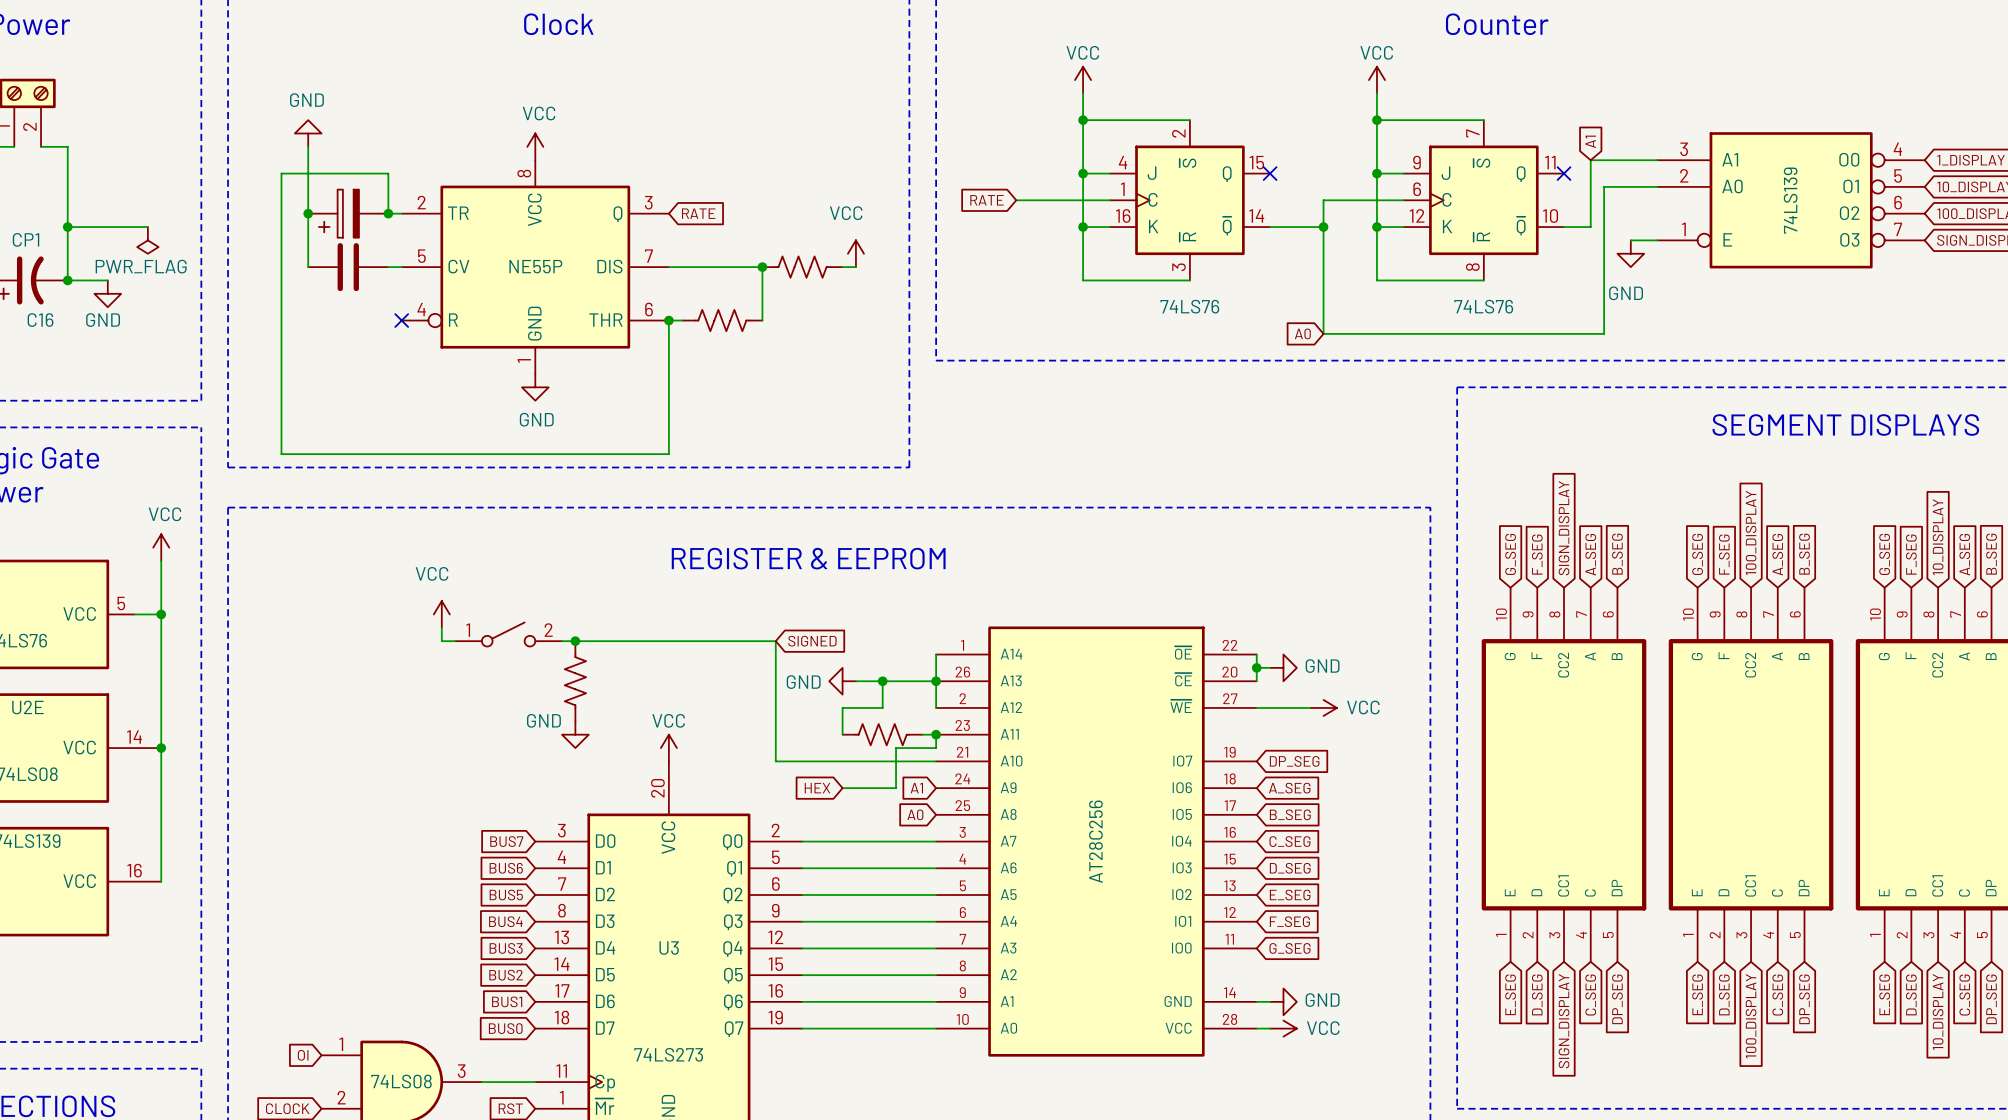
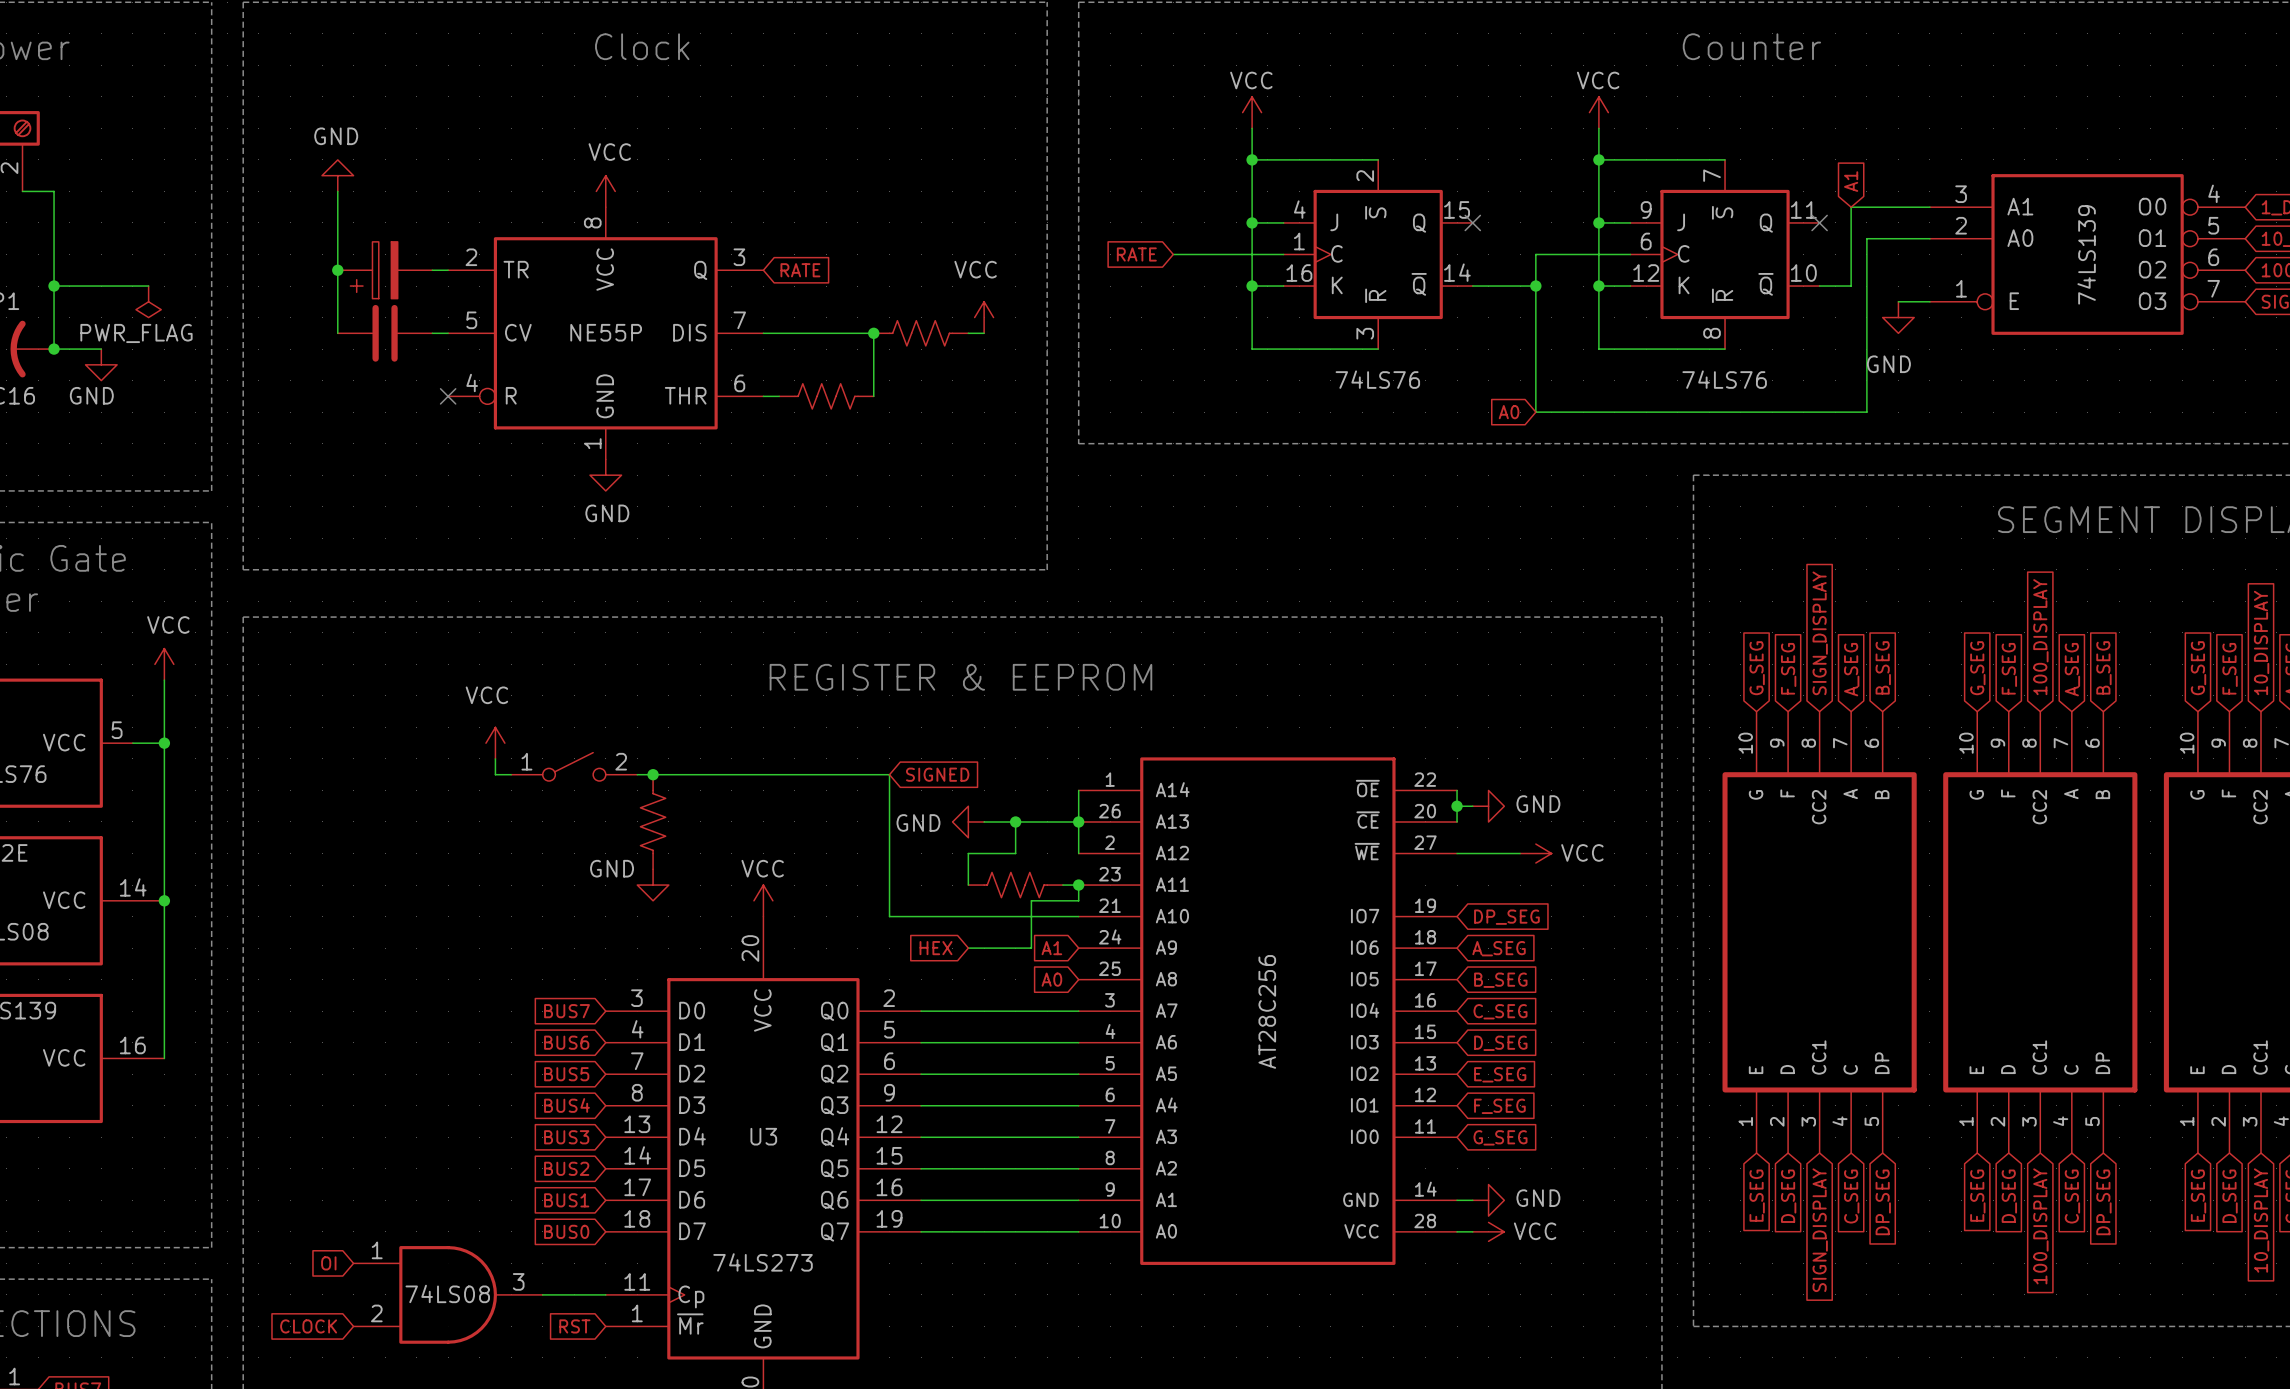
wire: (388, 213) (388, 173) (281, 173) (281, 454) (668, 454) (668, 320) -> none
junction: (388, 213) -> none
junction: (668, 320) -> none

